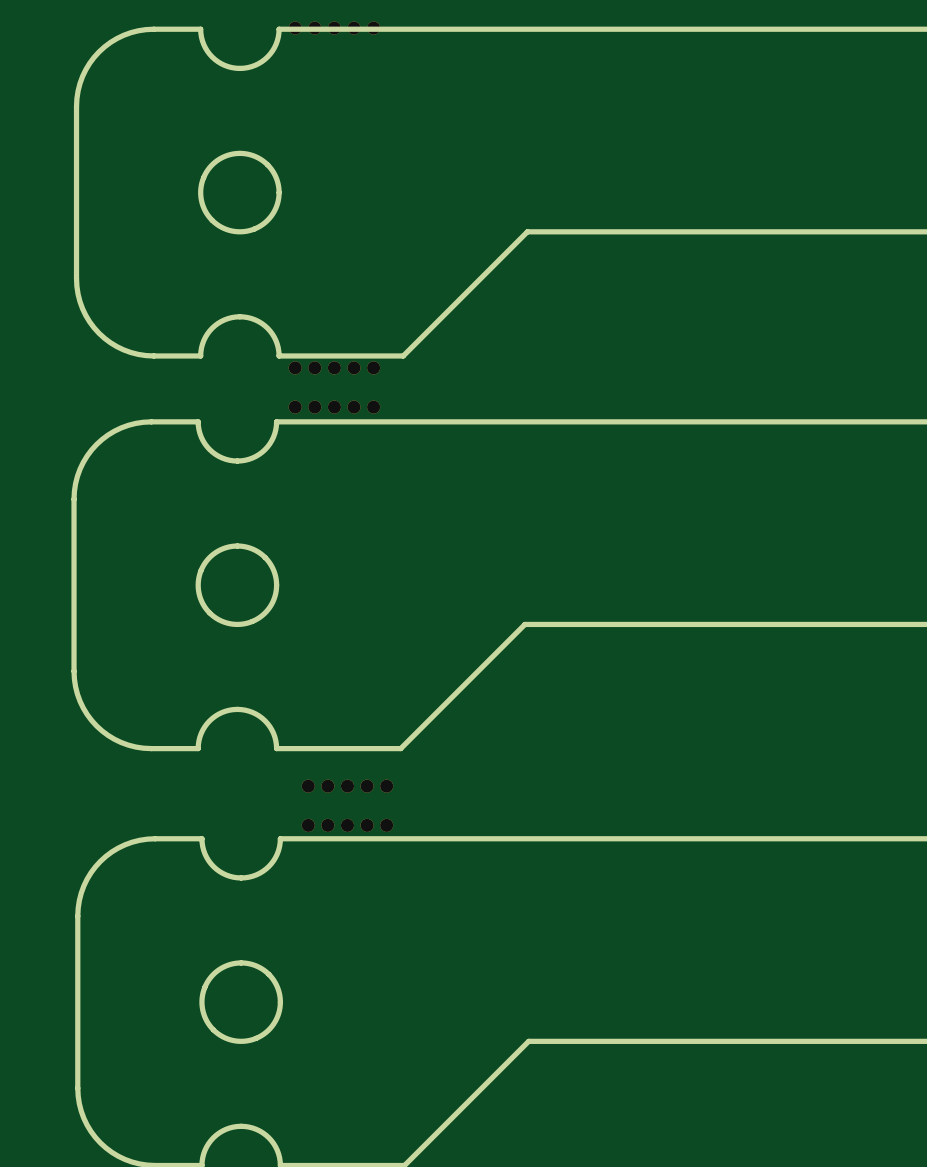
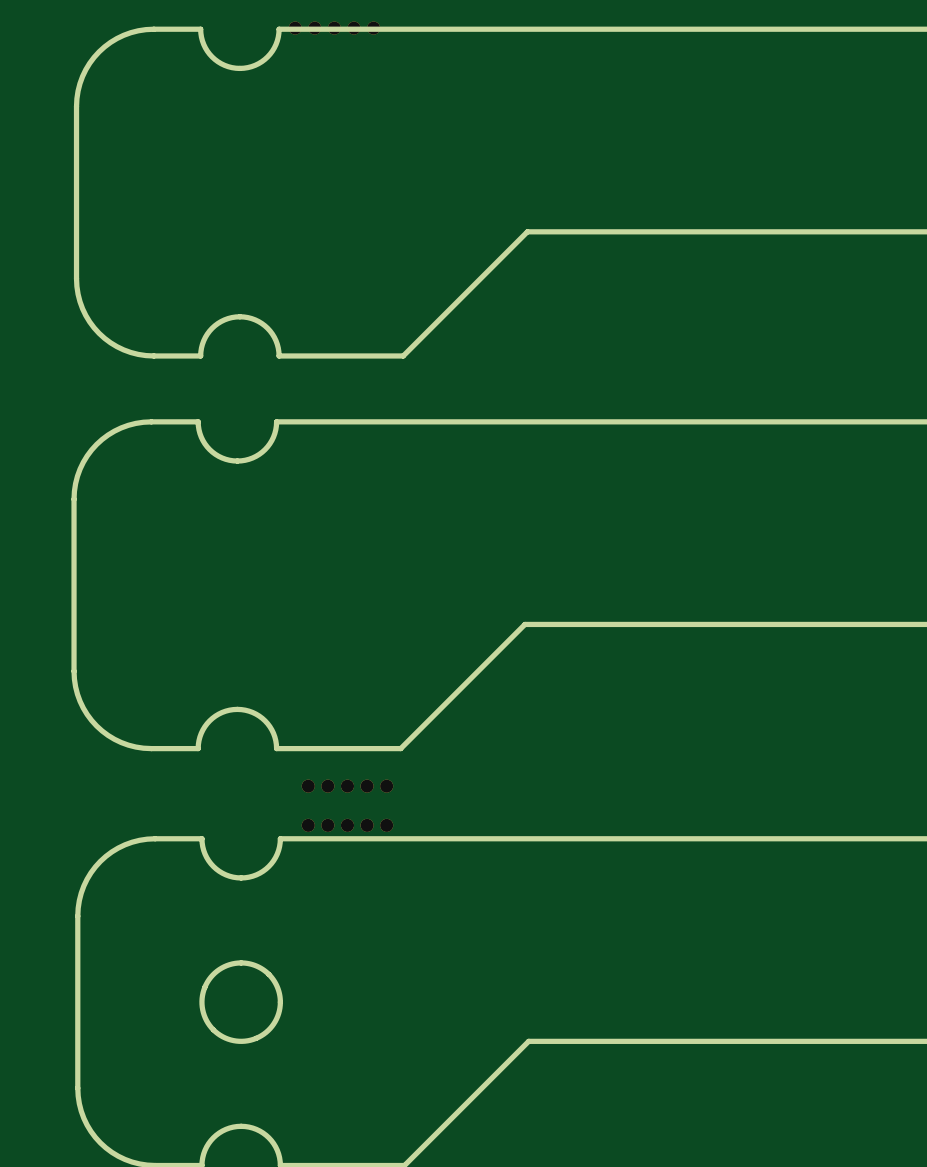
board edge: (239, 153) (254, 156) (267, 164) (276, 177) (279, 192) (276, 206) (267, 220) (254, 228) (240, 231) (224, 228) (212, 220) (204, 208) (200, 191) (203, 177) (211, 165) (225, 156) (239, 153) -> none
part: (334, 387) -> none
board edge: (237, 546) (223, 548) (209, 558) (201, 570) (198, 584) (201, 601) (209, 612) (221, 621) (238, 624) (252, 621) (264, 613) (273, 599) (276, 585) (273, 570) (265, 557) (252, 549) (237, 546) -> none

